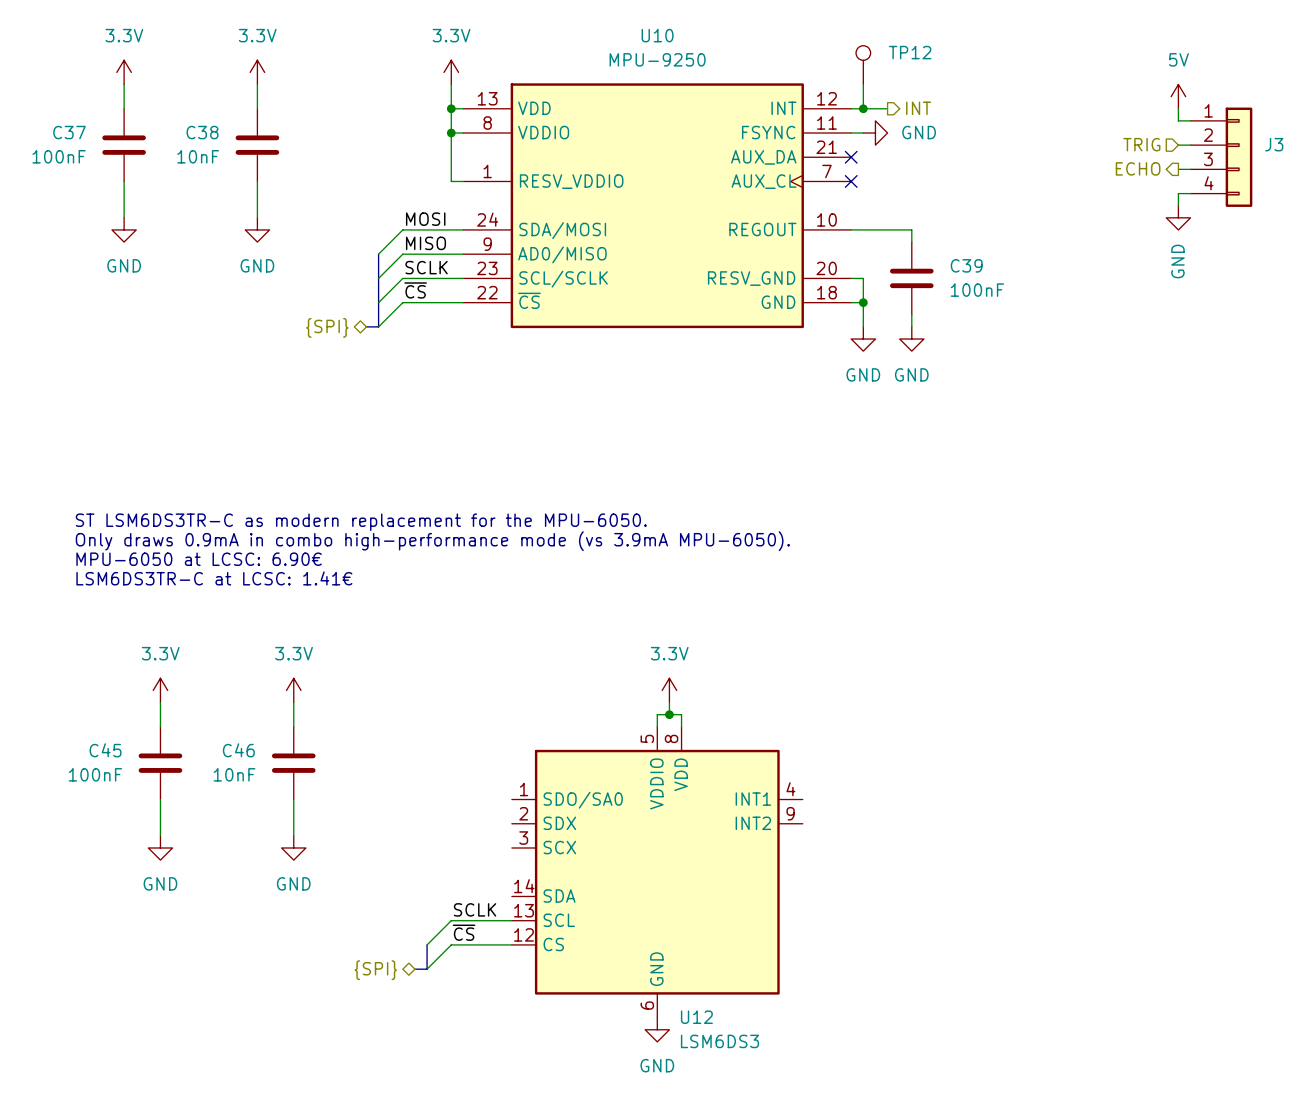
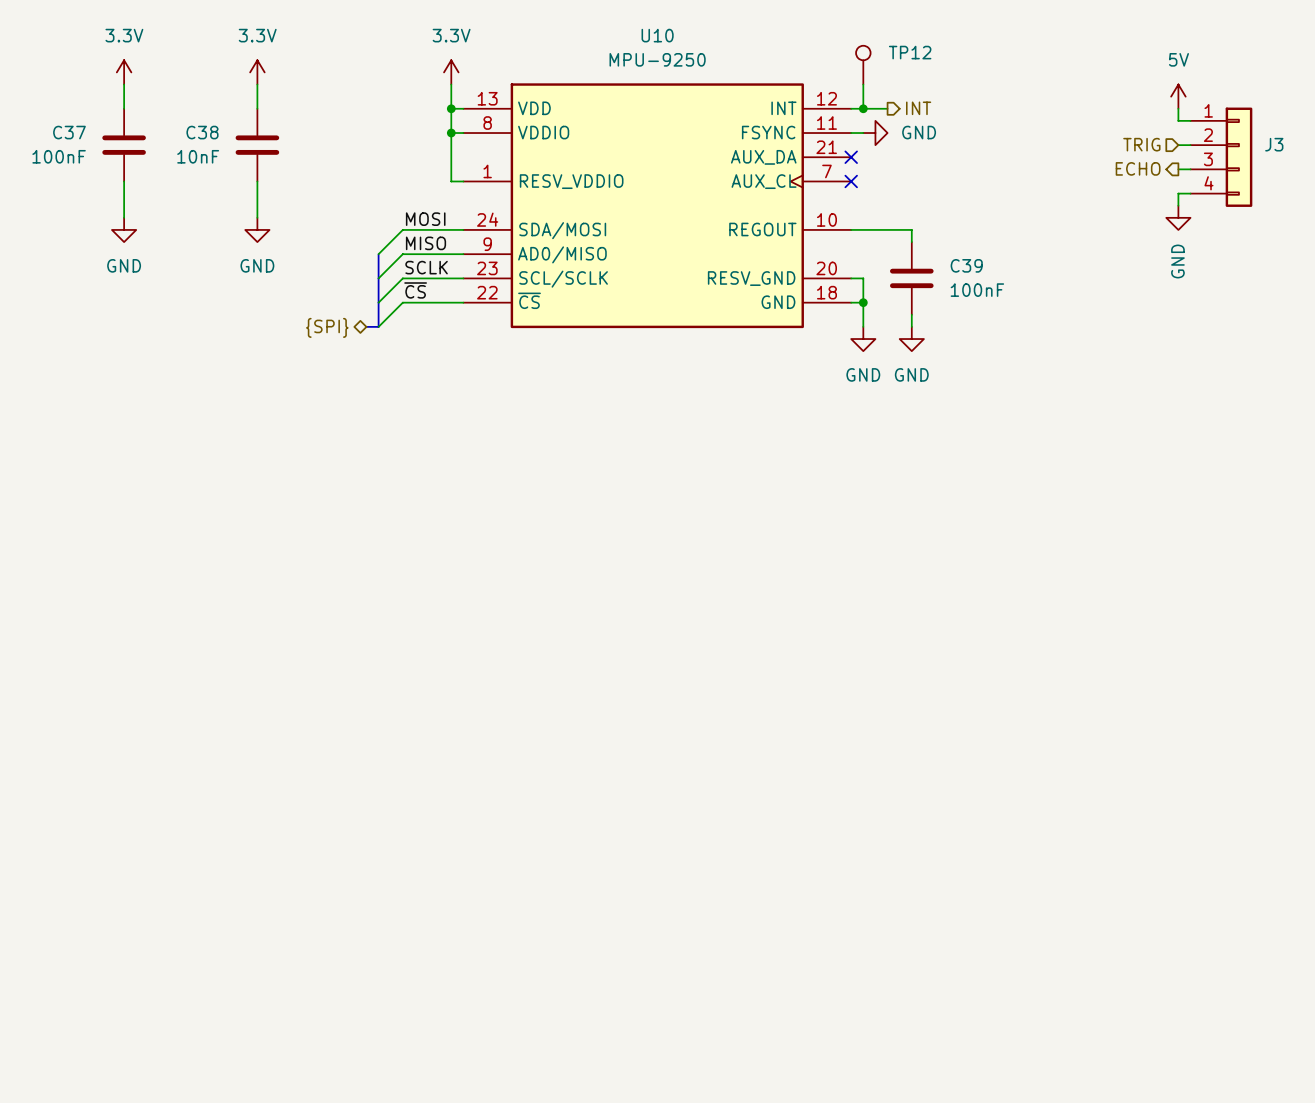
text: ST LSM6DS3TR-C as modern replacement for the MPU-6050. (361, 522) -> none
text: Only draws 0.9mA in combo high-performance mode (vs 3.9mA MPU-6050). (432, 541) -> none
text: MPU-6050 at LCSC: 6.90€ (199, 559) -> none
text: LSM6DS3TR-C at LCSC: 1.41€ (214, 578) -> none
power symbol: 3.3V (160, 690) -> none
power symbol: 3.3V (293, 690) -> none
power symbol: 3.3V (669, 690) -> none
wire: (160, 702) (160, 726) -> none
wire: (293, 702) (293, 726) -> none
wire: (669, 702) (669, 714) -> none
junction: (669, 714) -> none
wire: (657, 726) (657, 714) (681, 714) (681, 726) -> none
C45: 100nF (160, 763) -> none
C46: 10nF (293, 763) -> none
wire: (160, 799) (160, 835) -> none
wire: (293, 799) (293, 835) -> none
power symbol: GND (160, 847) -> none
power symbol: GND (293, 847) -> none
U12: LSM6DS3 (657, 872) -> none
label: SCLK (475, 909) -> none
wire: (511, 920) (451, 920) (427, 944) -> none
label: ~{CS} (464, 932) -> none
bus: (427, 944) (427, 969) (414, 969) -> none
wire: (511, 944) (451, 944) (427, 969) -> none
hierarchical label: {SPI} (375, 970) -> none
power symbol: GND (657, 1029) -> none

